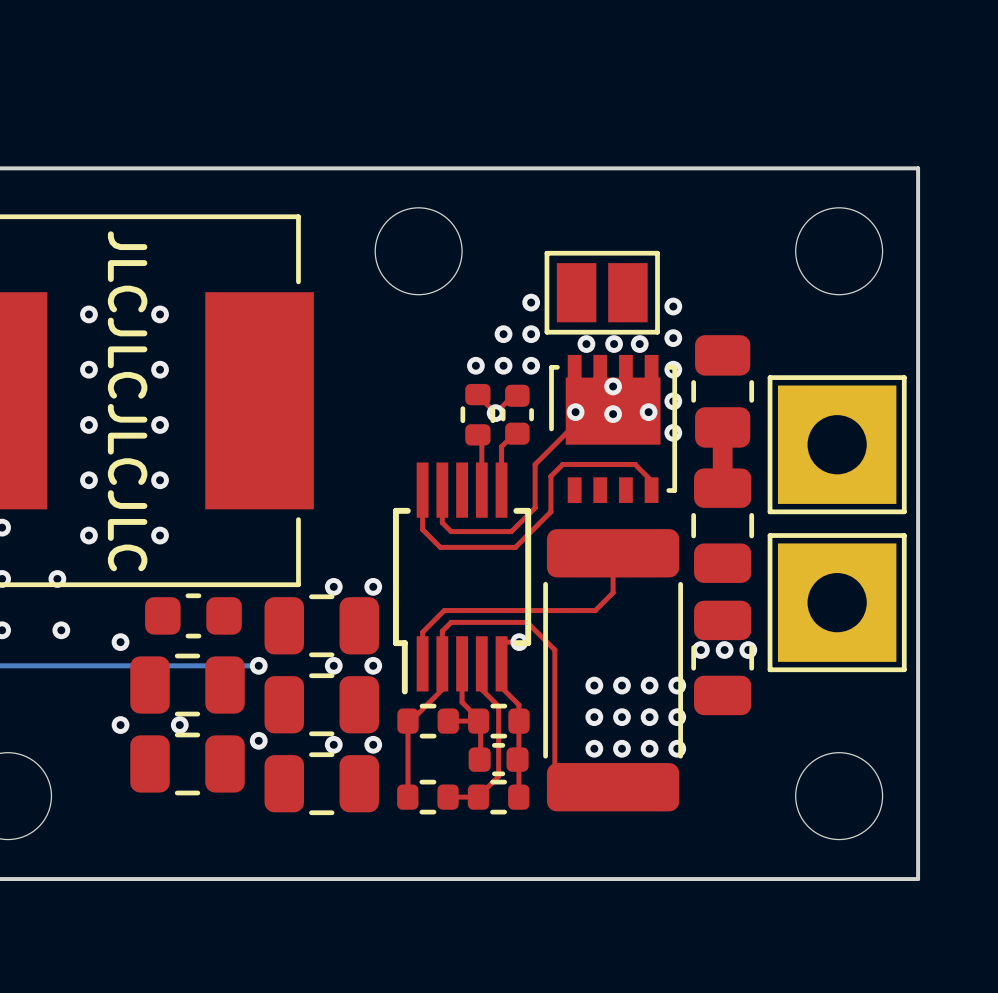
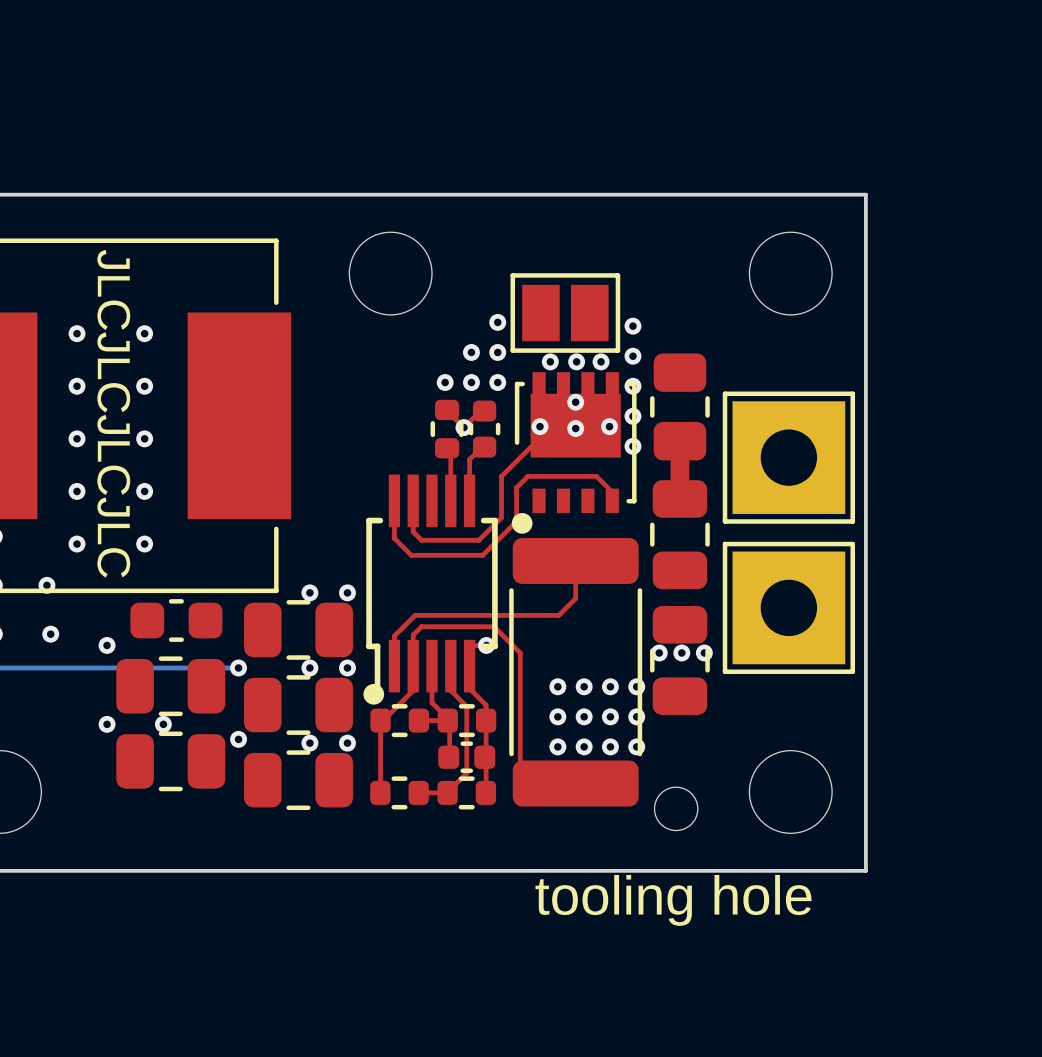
drawing: none -> [511, 513, 533, 534]
drawing: none -> [363, 683, 385, 705]
part: none -> (676, 808)

